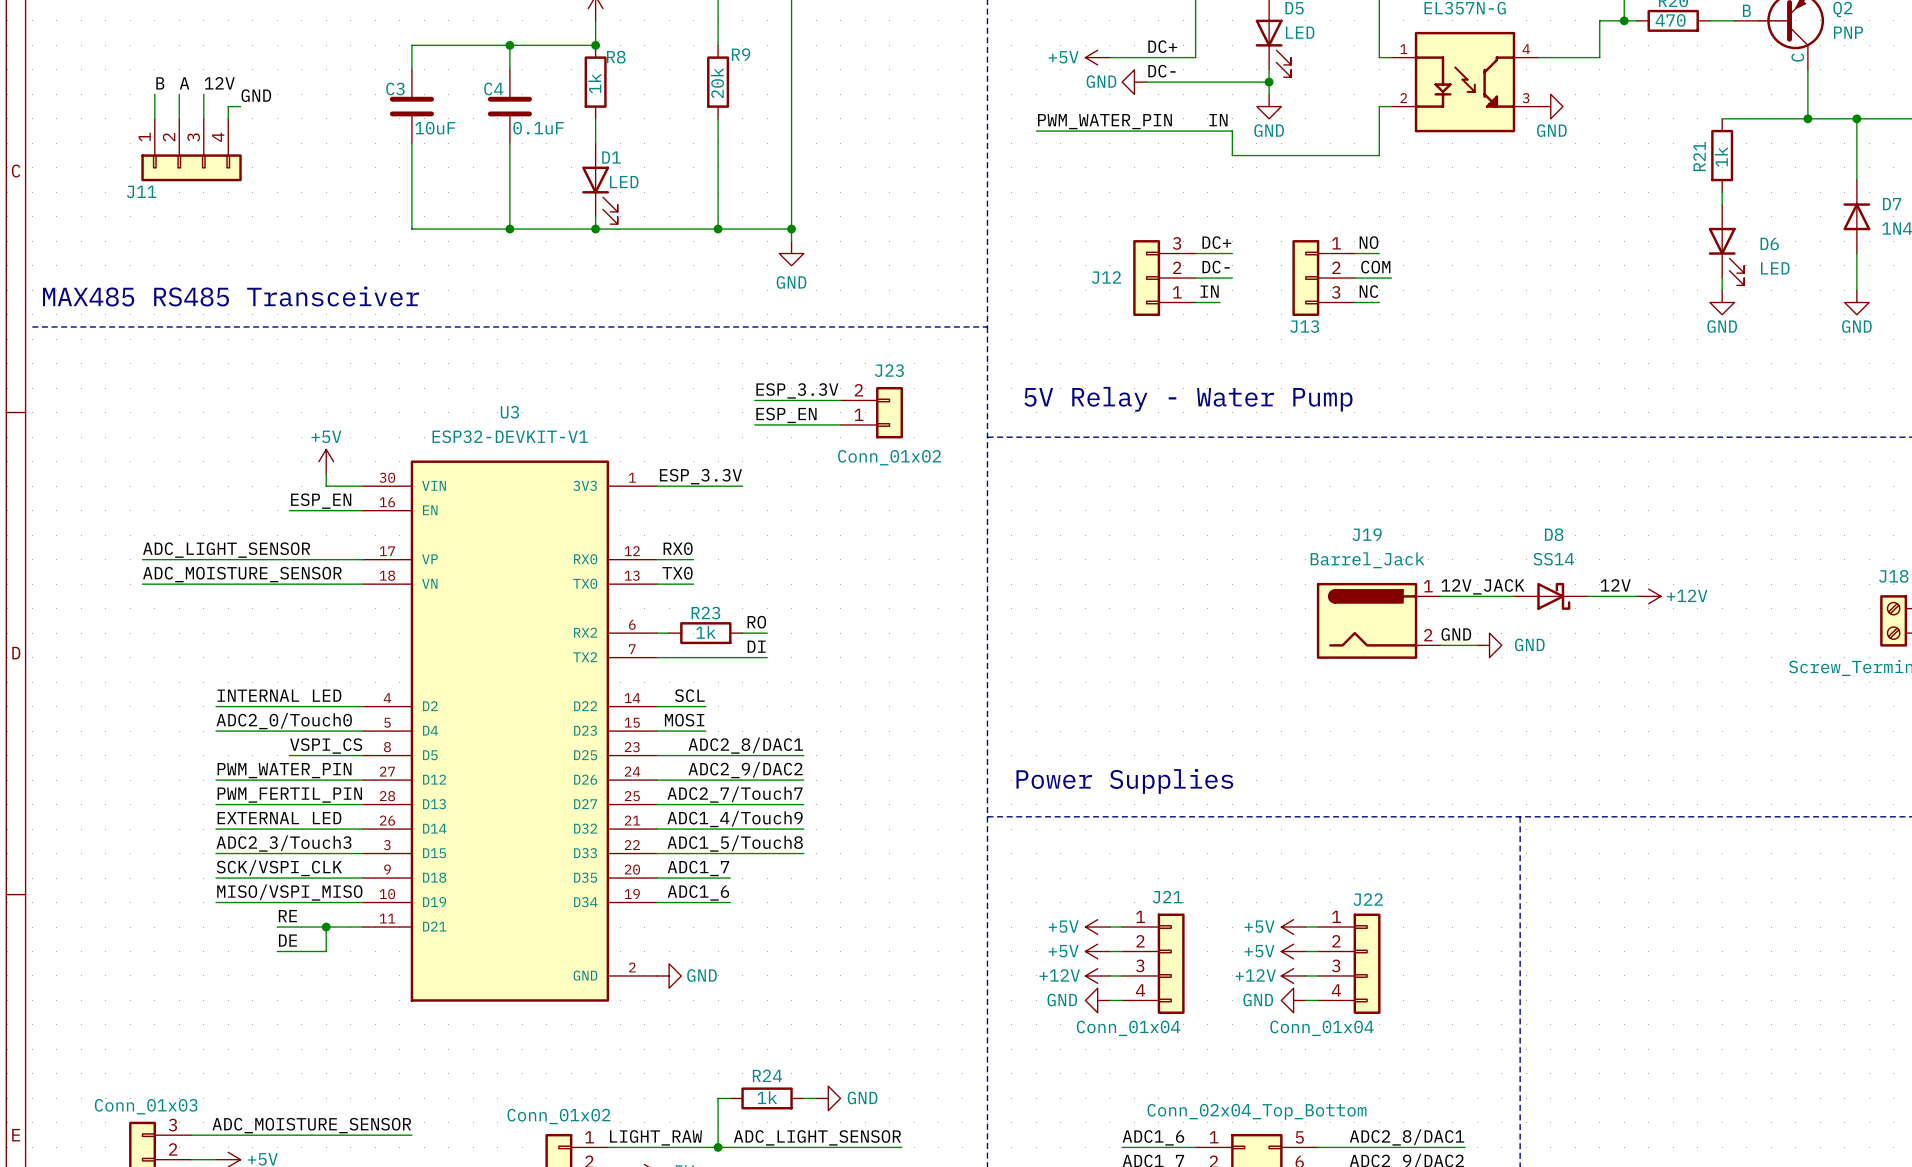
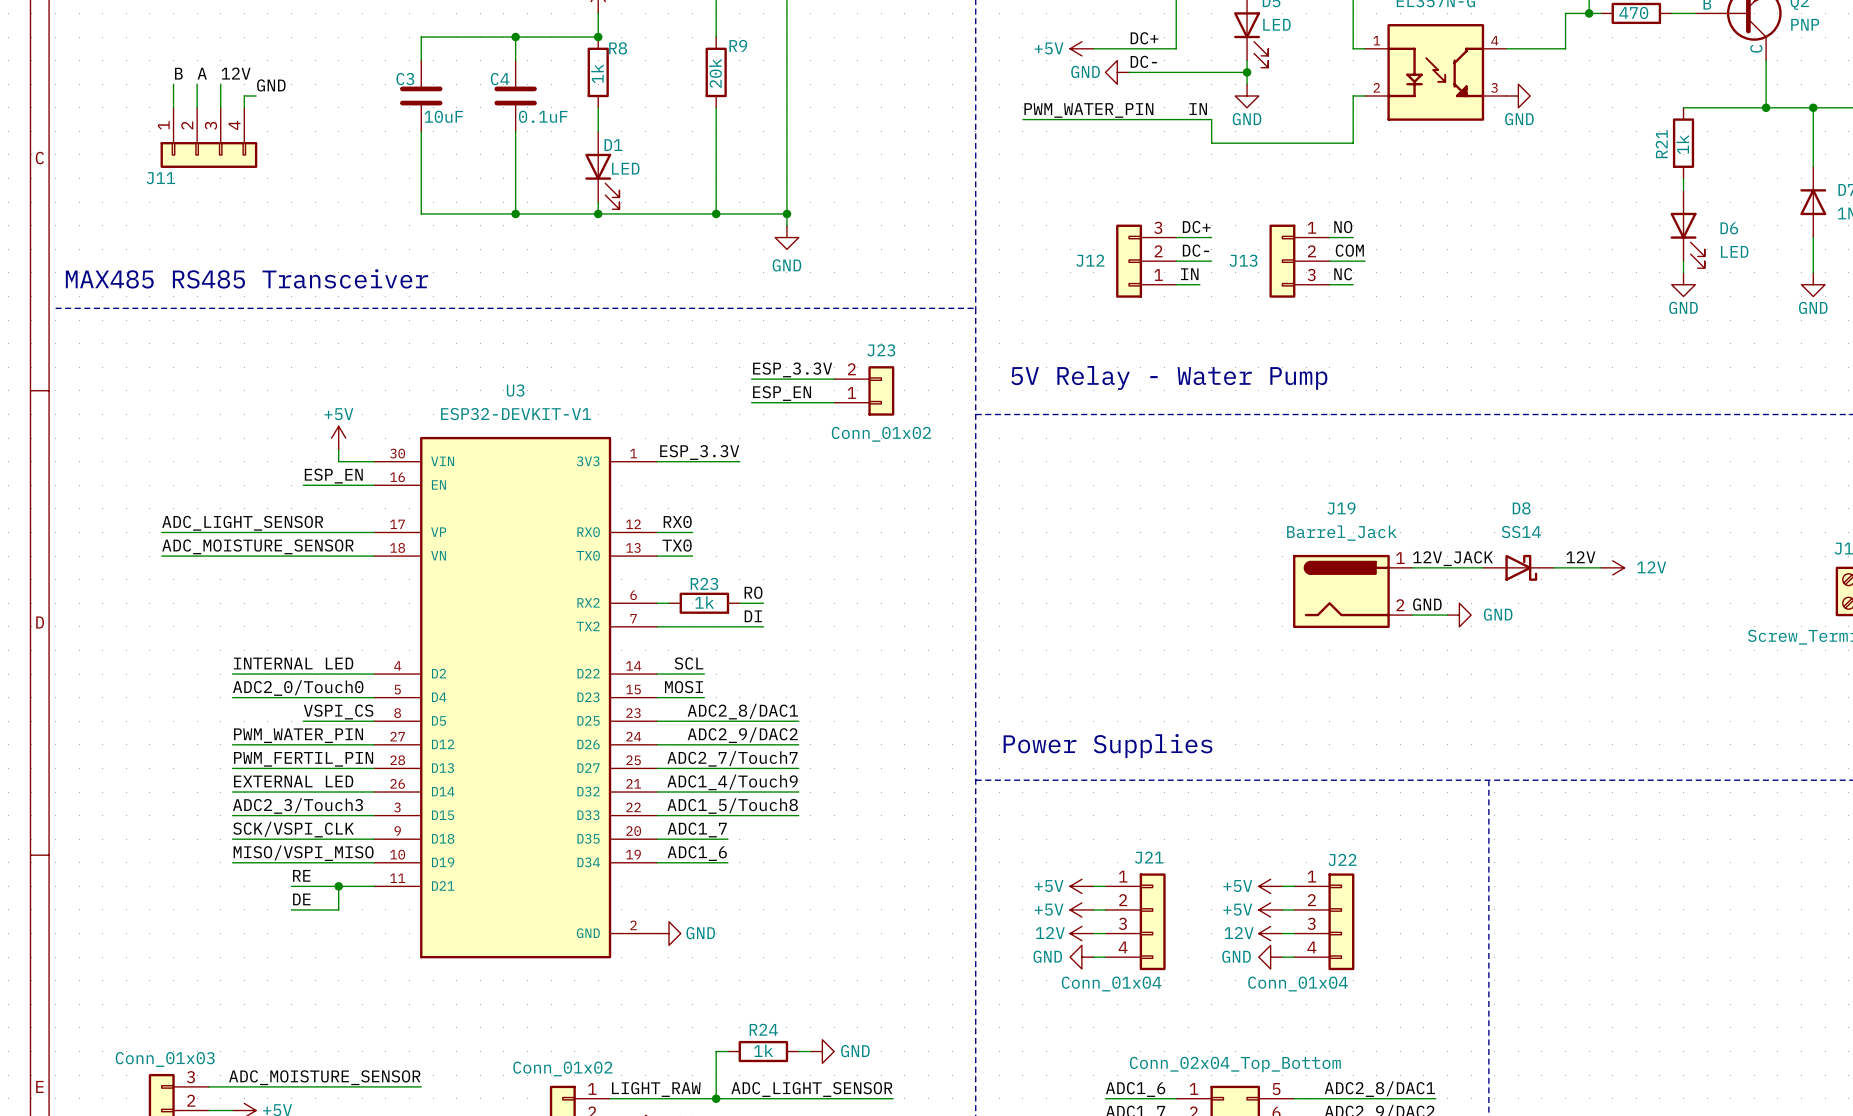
J13 name position: J13 (1304, 326) -> J13 (1243, 260)
power symbol: +12V (1648, 596) -> 12V (1612, 567)
power symbol: +12V (1097, 975) -> 12V (1081, 933)
power symbol: +12V (1293, 975) -> 12V (1270, 933)

